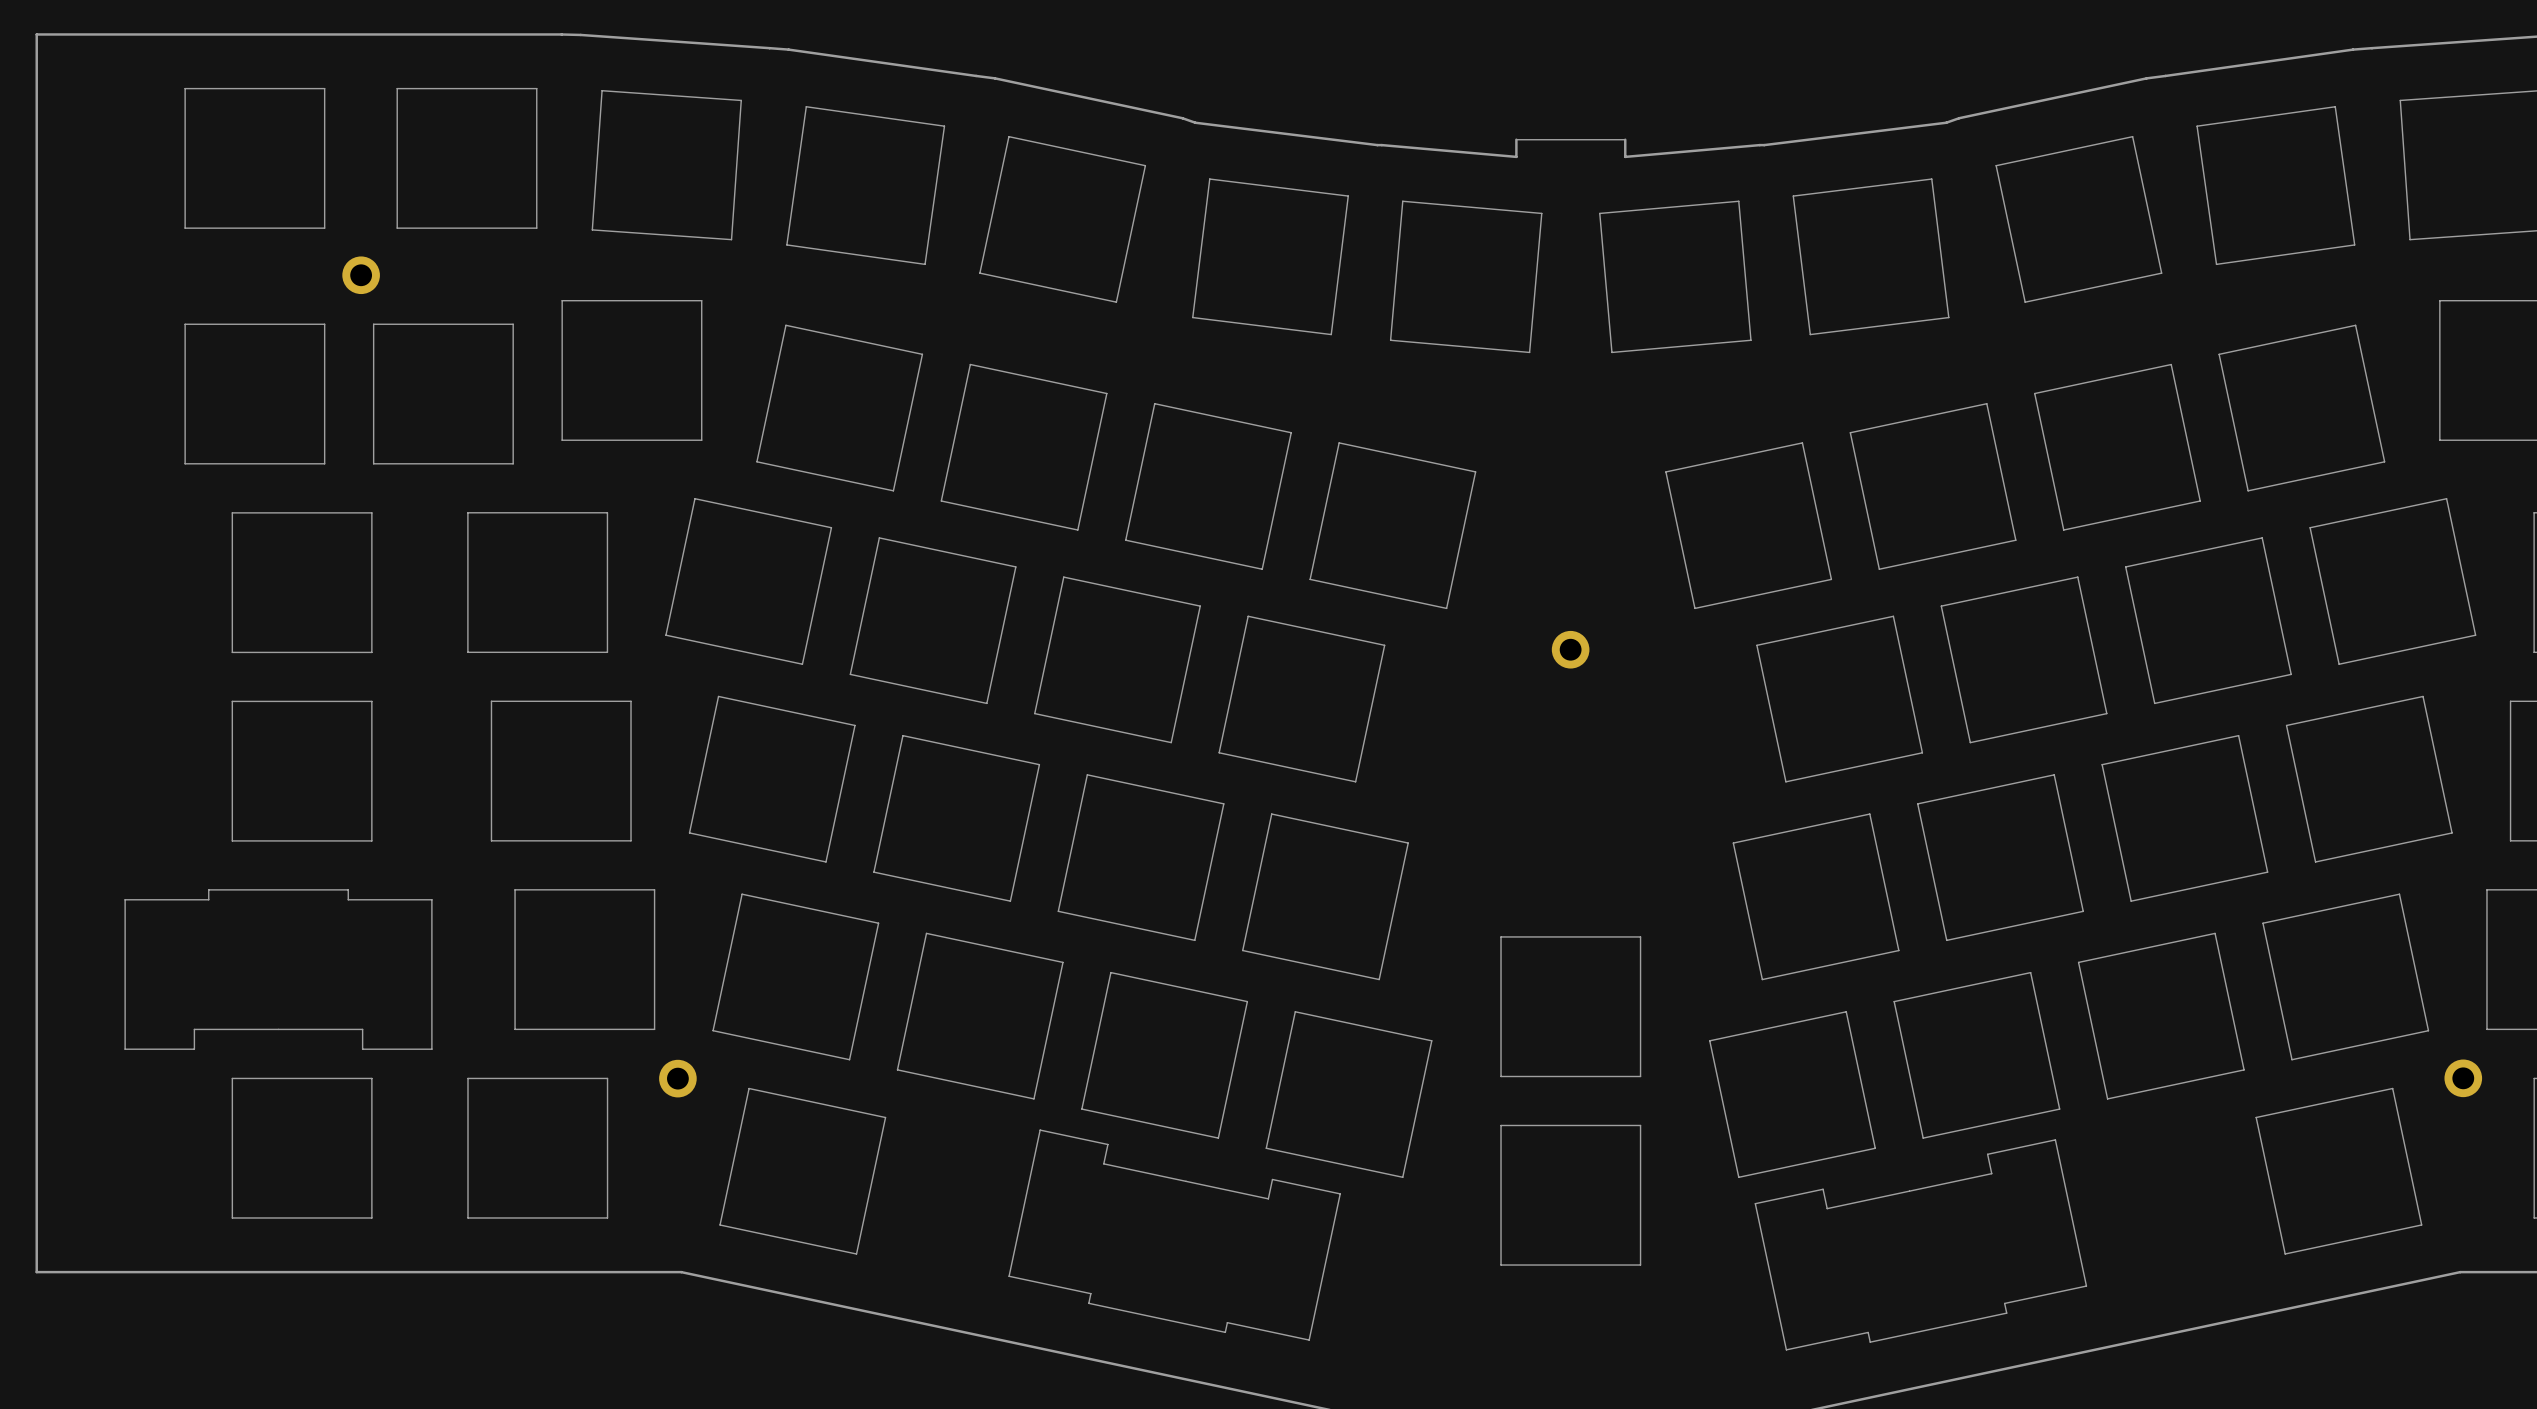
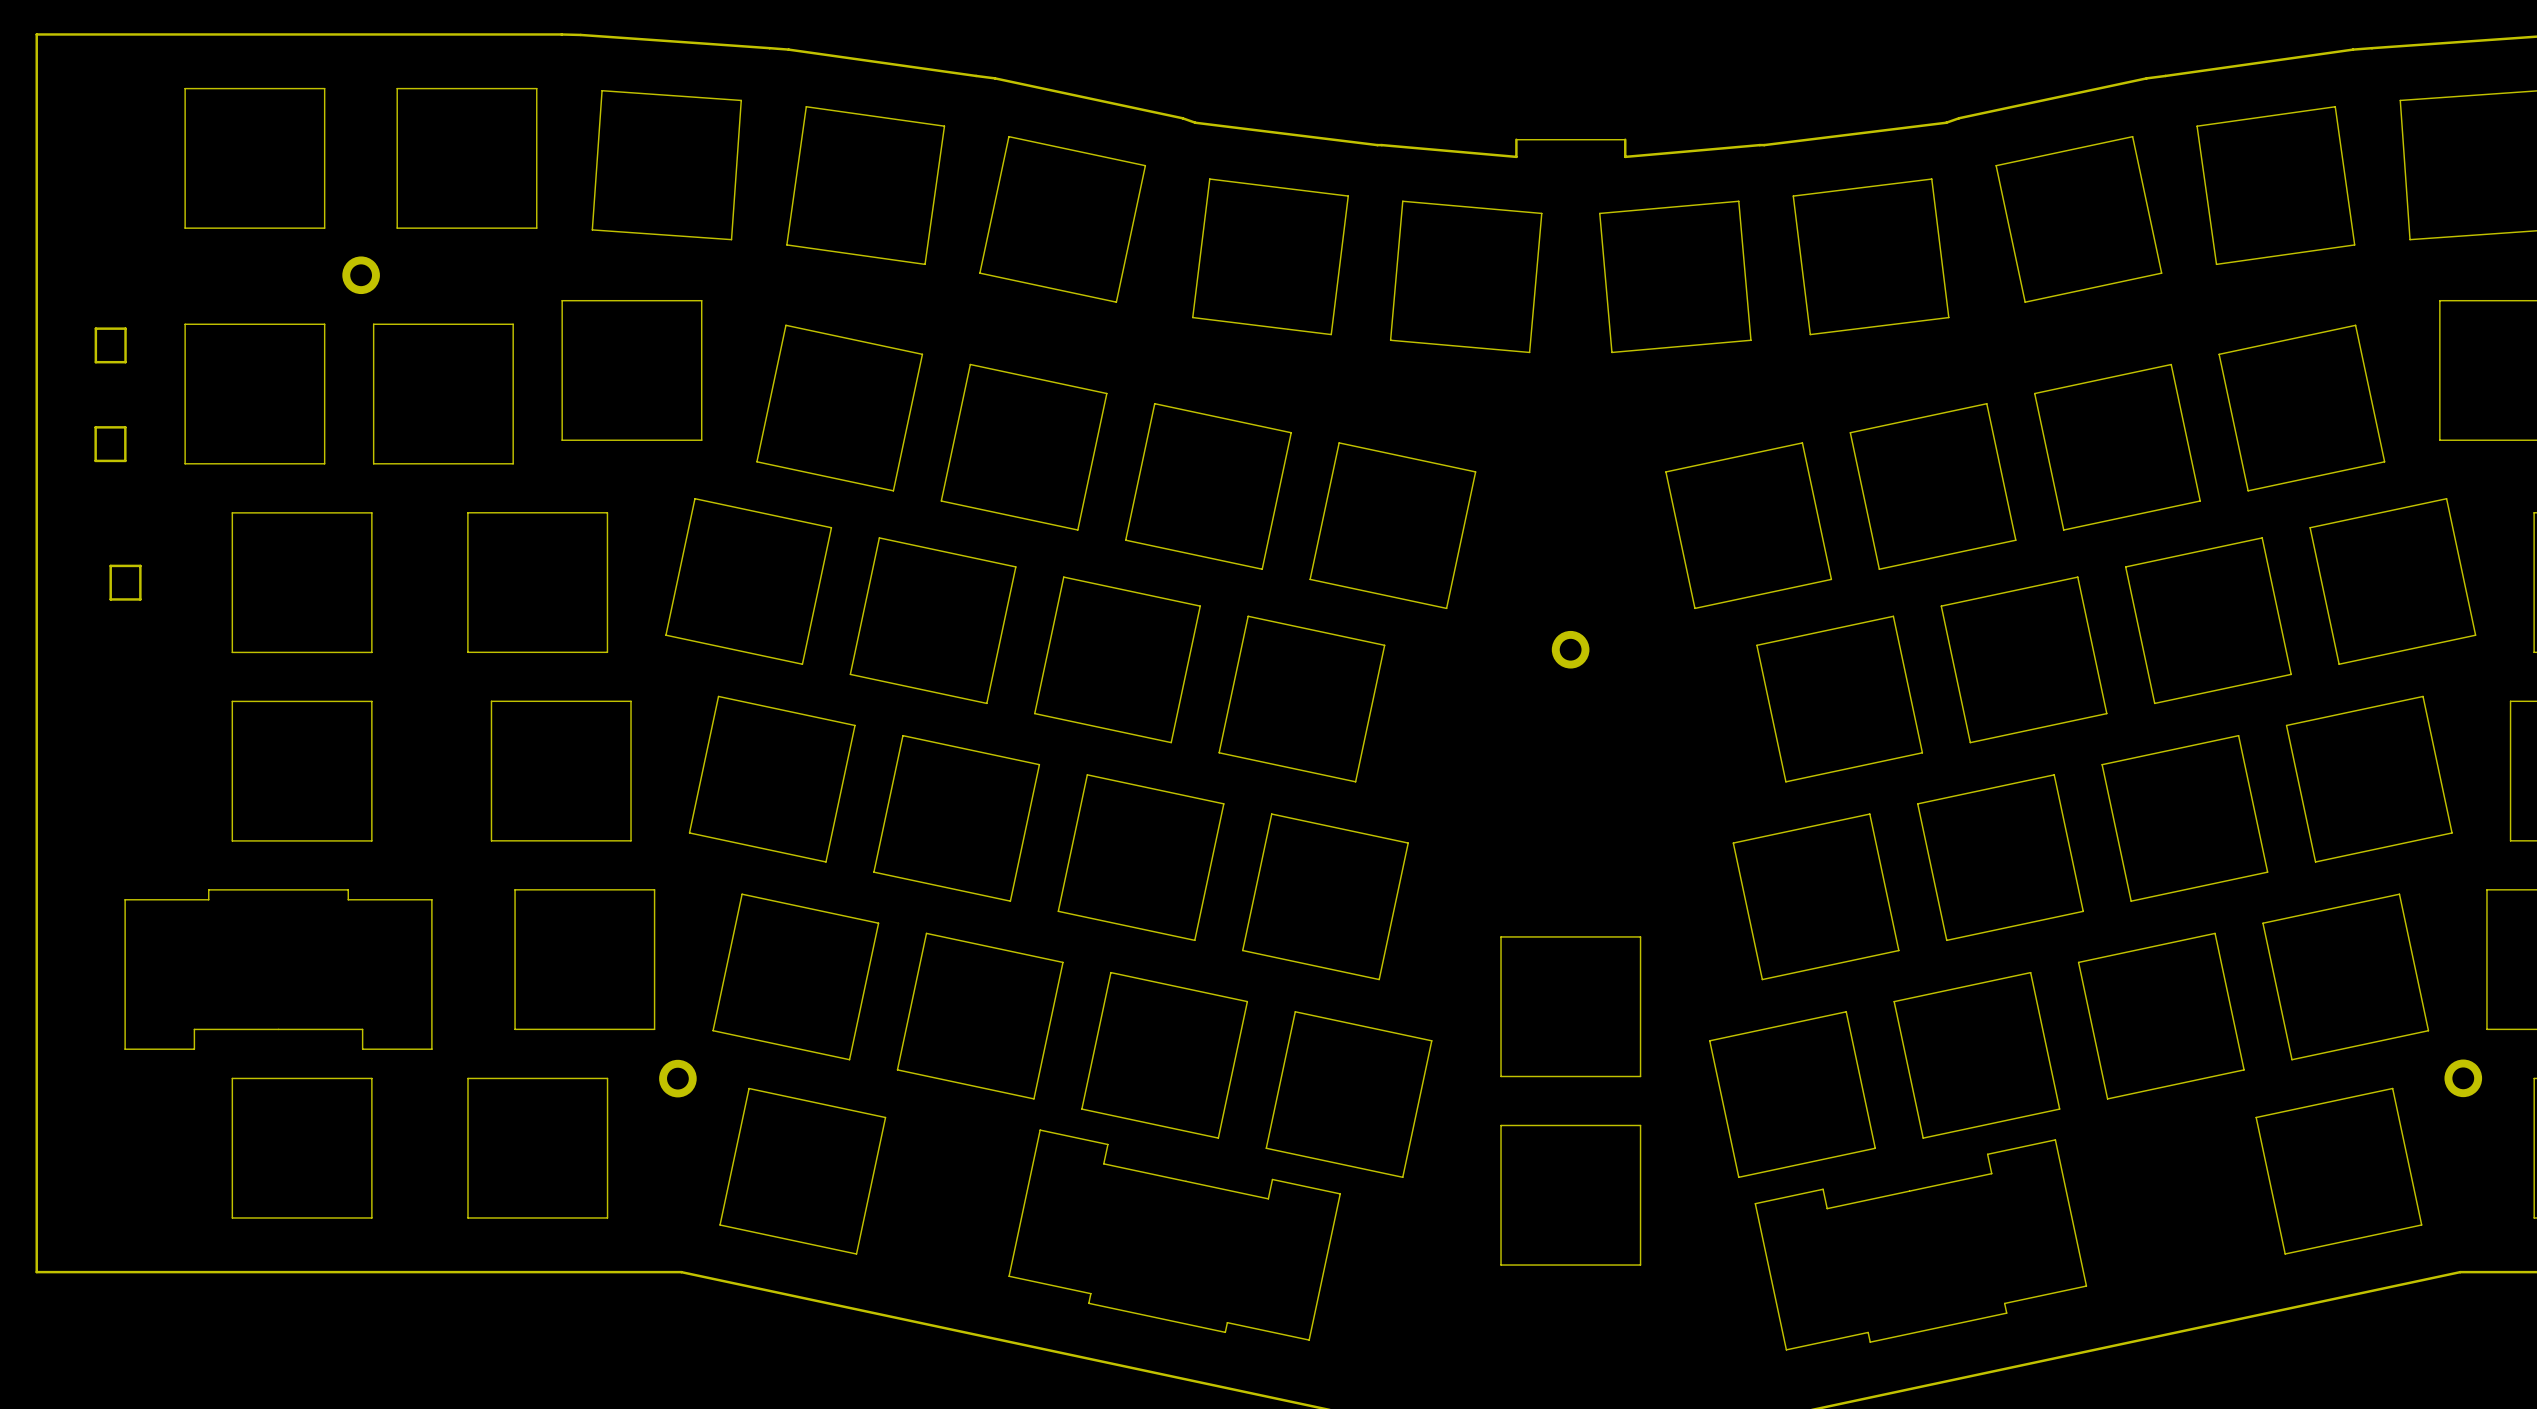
board edge: none -> (95, 328) (125, 328) (125, 362) (95, 362) (95, 328)
board edge: none -> (95, 427) (125, 427) (125, 460) (95, 460) (95, 427)
board edge: none -> (110, 565) (140, 565) (140, 599) (110, 599) (110, 565)

